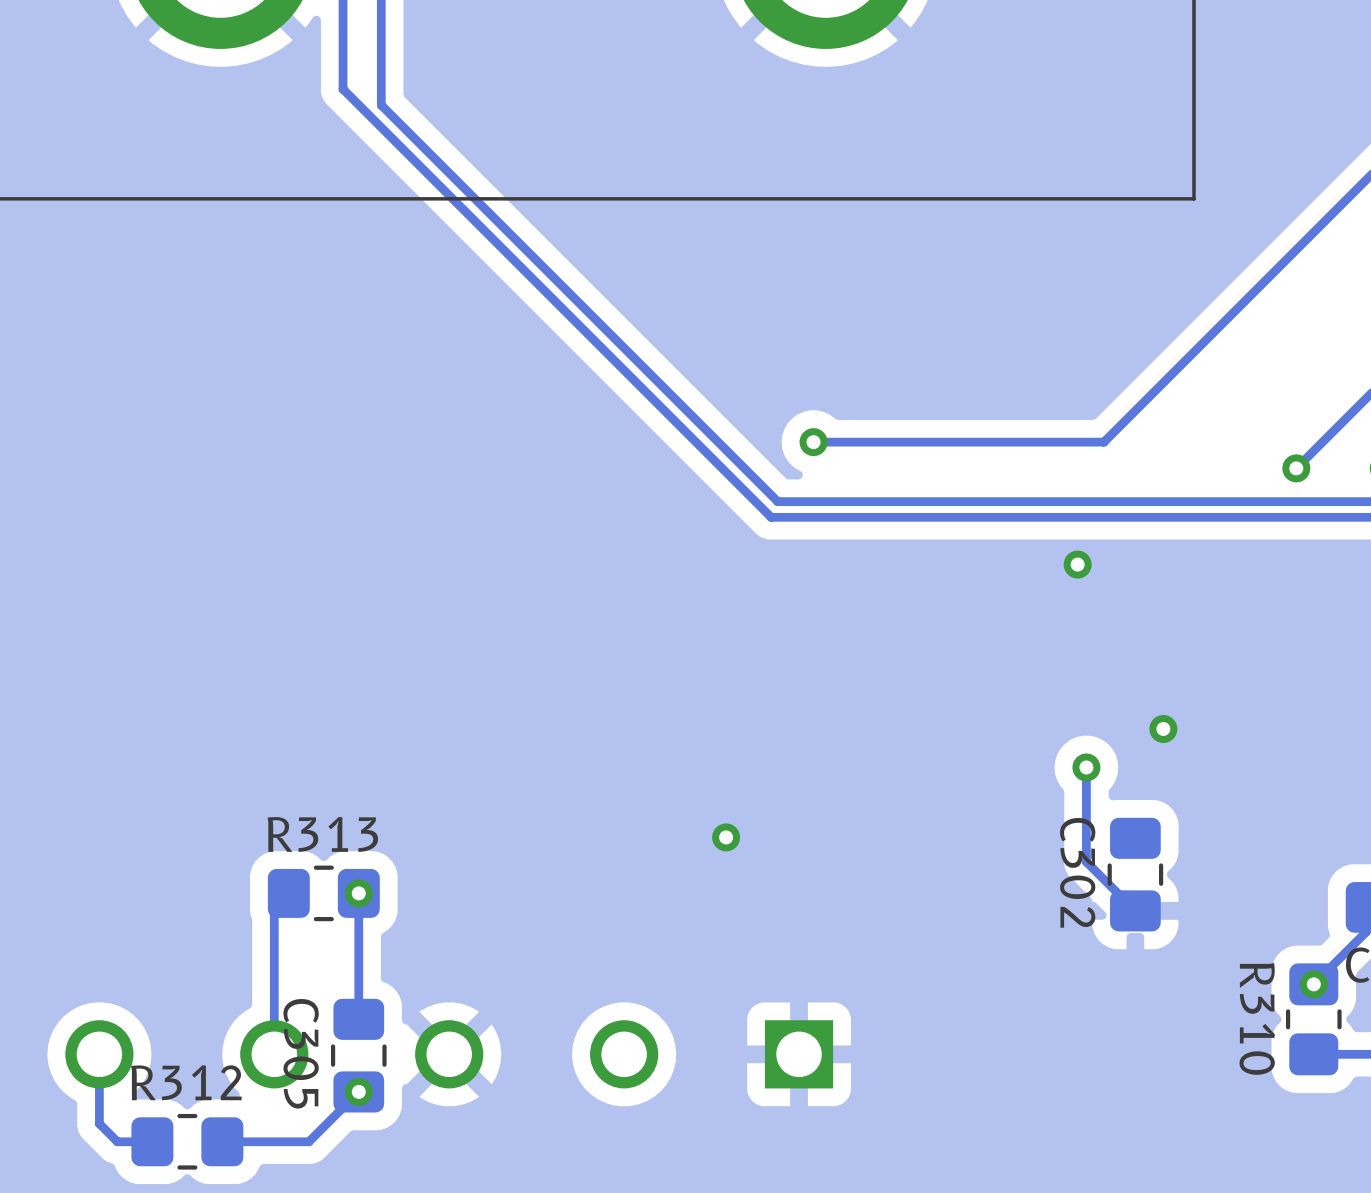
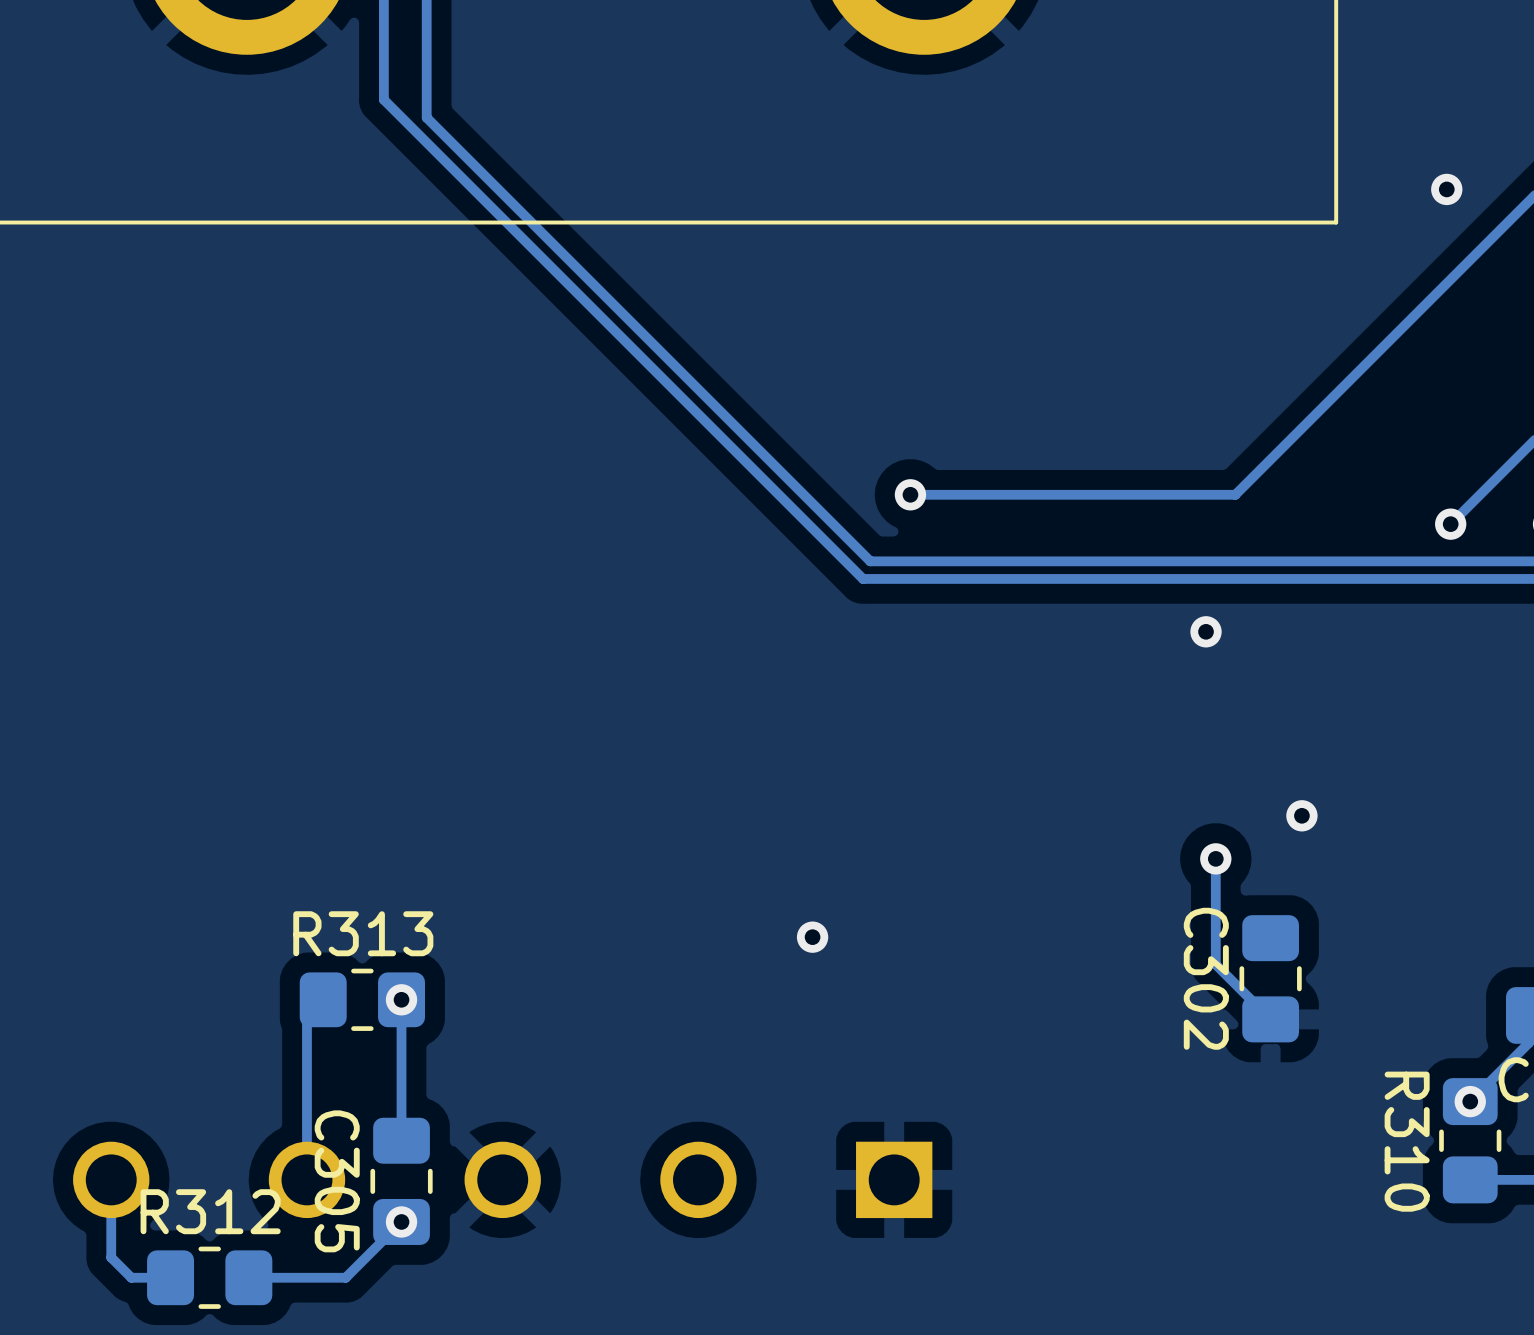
via: none -> (1446, 189)

